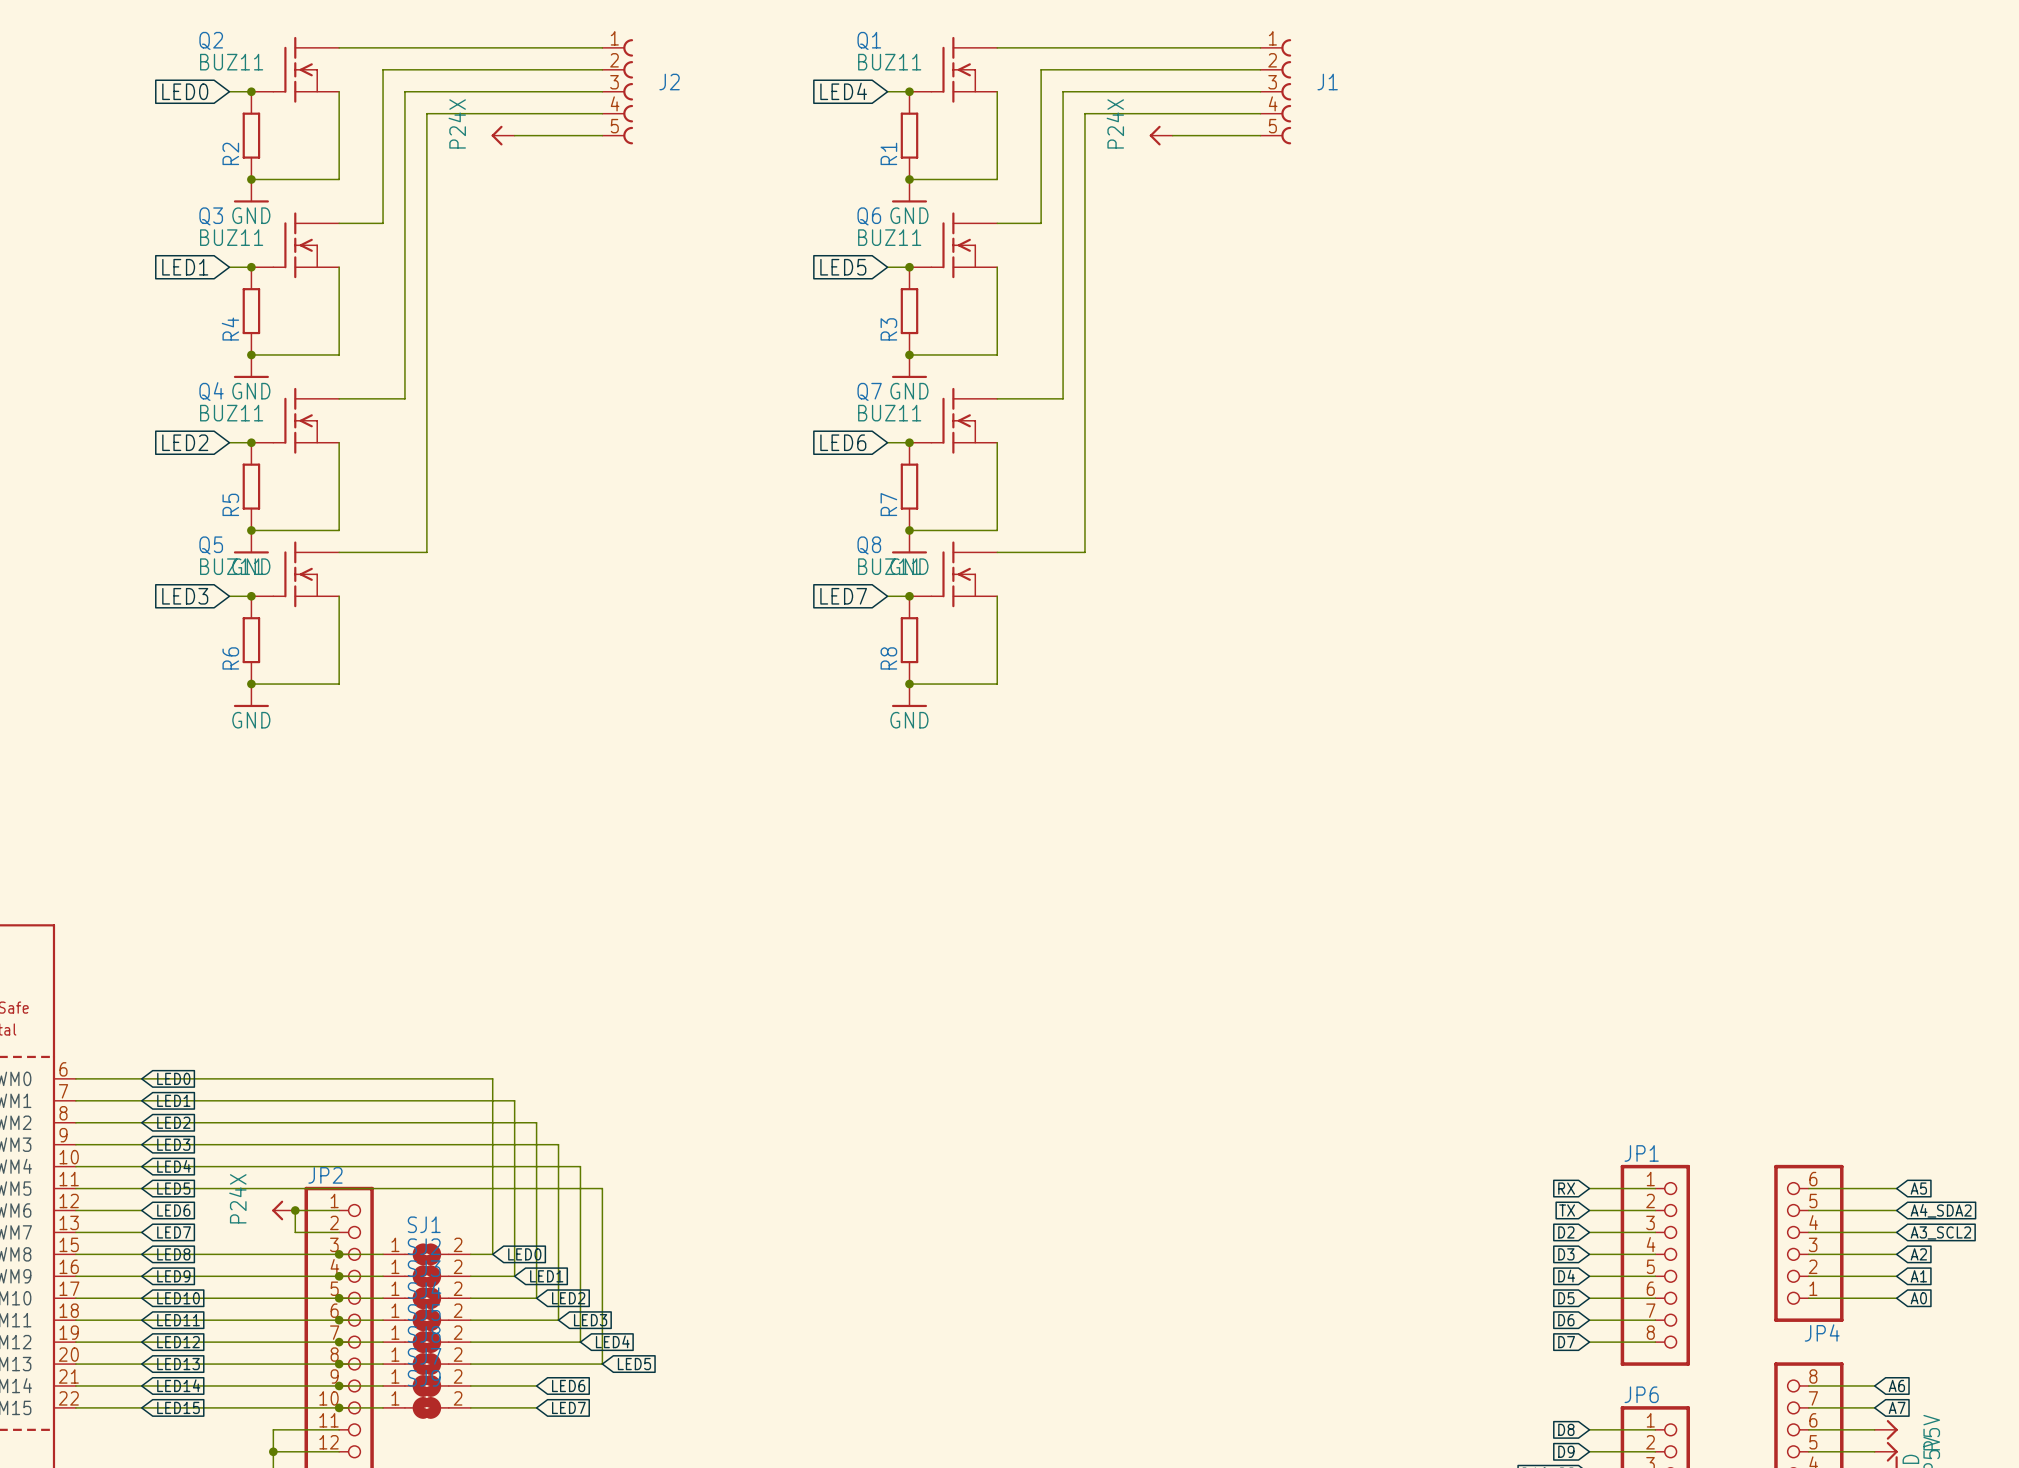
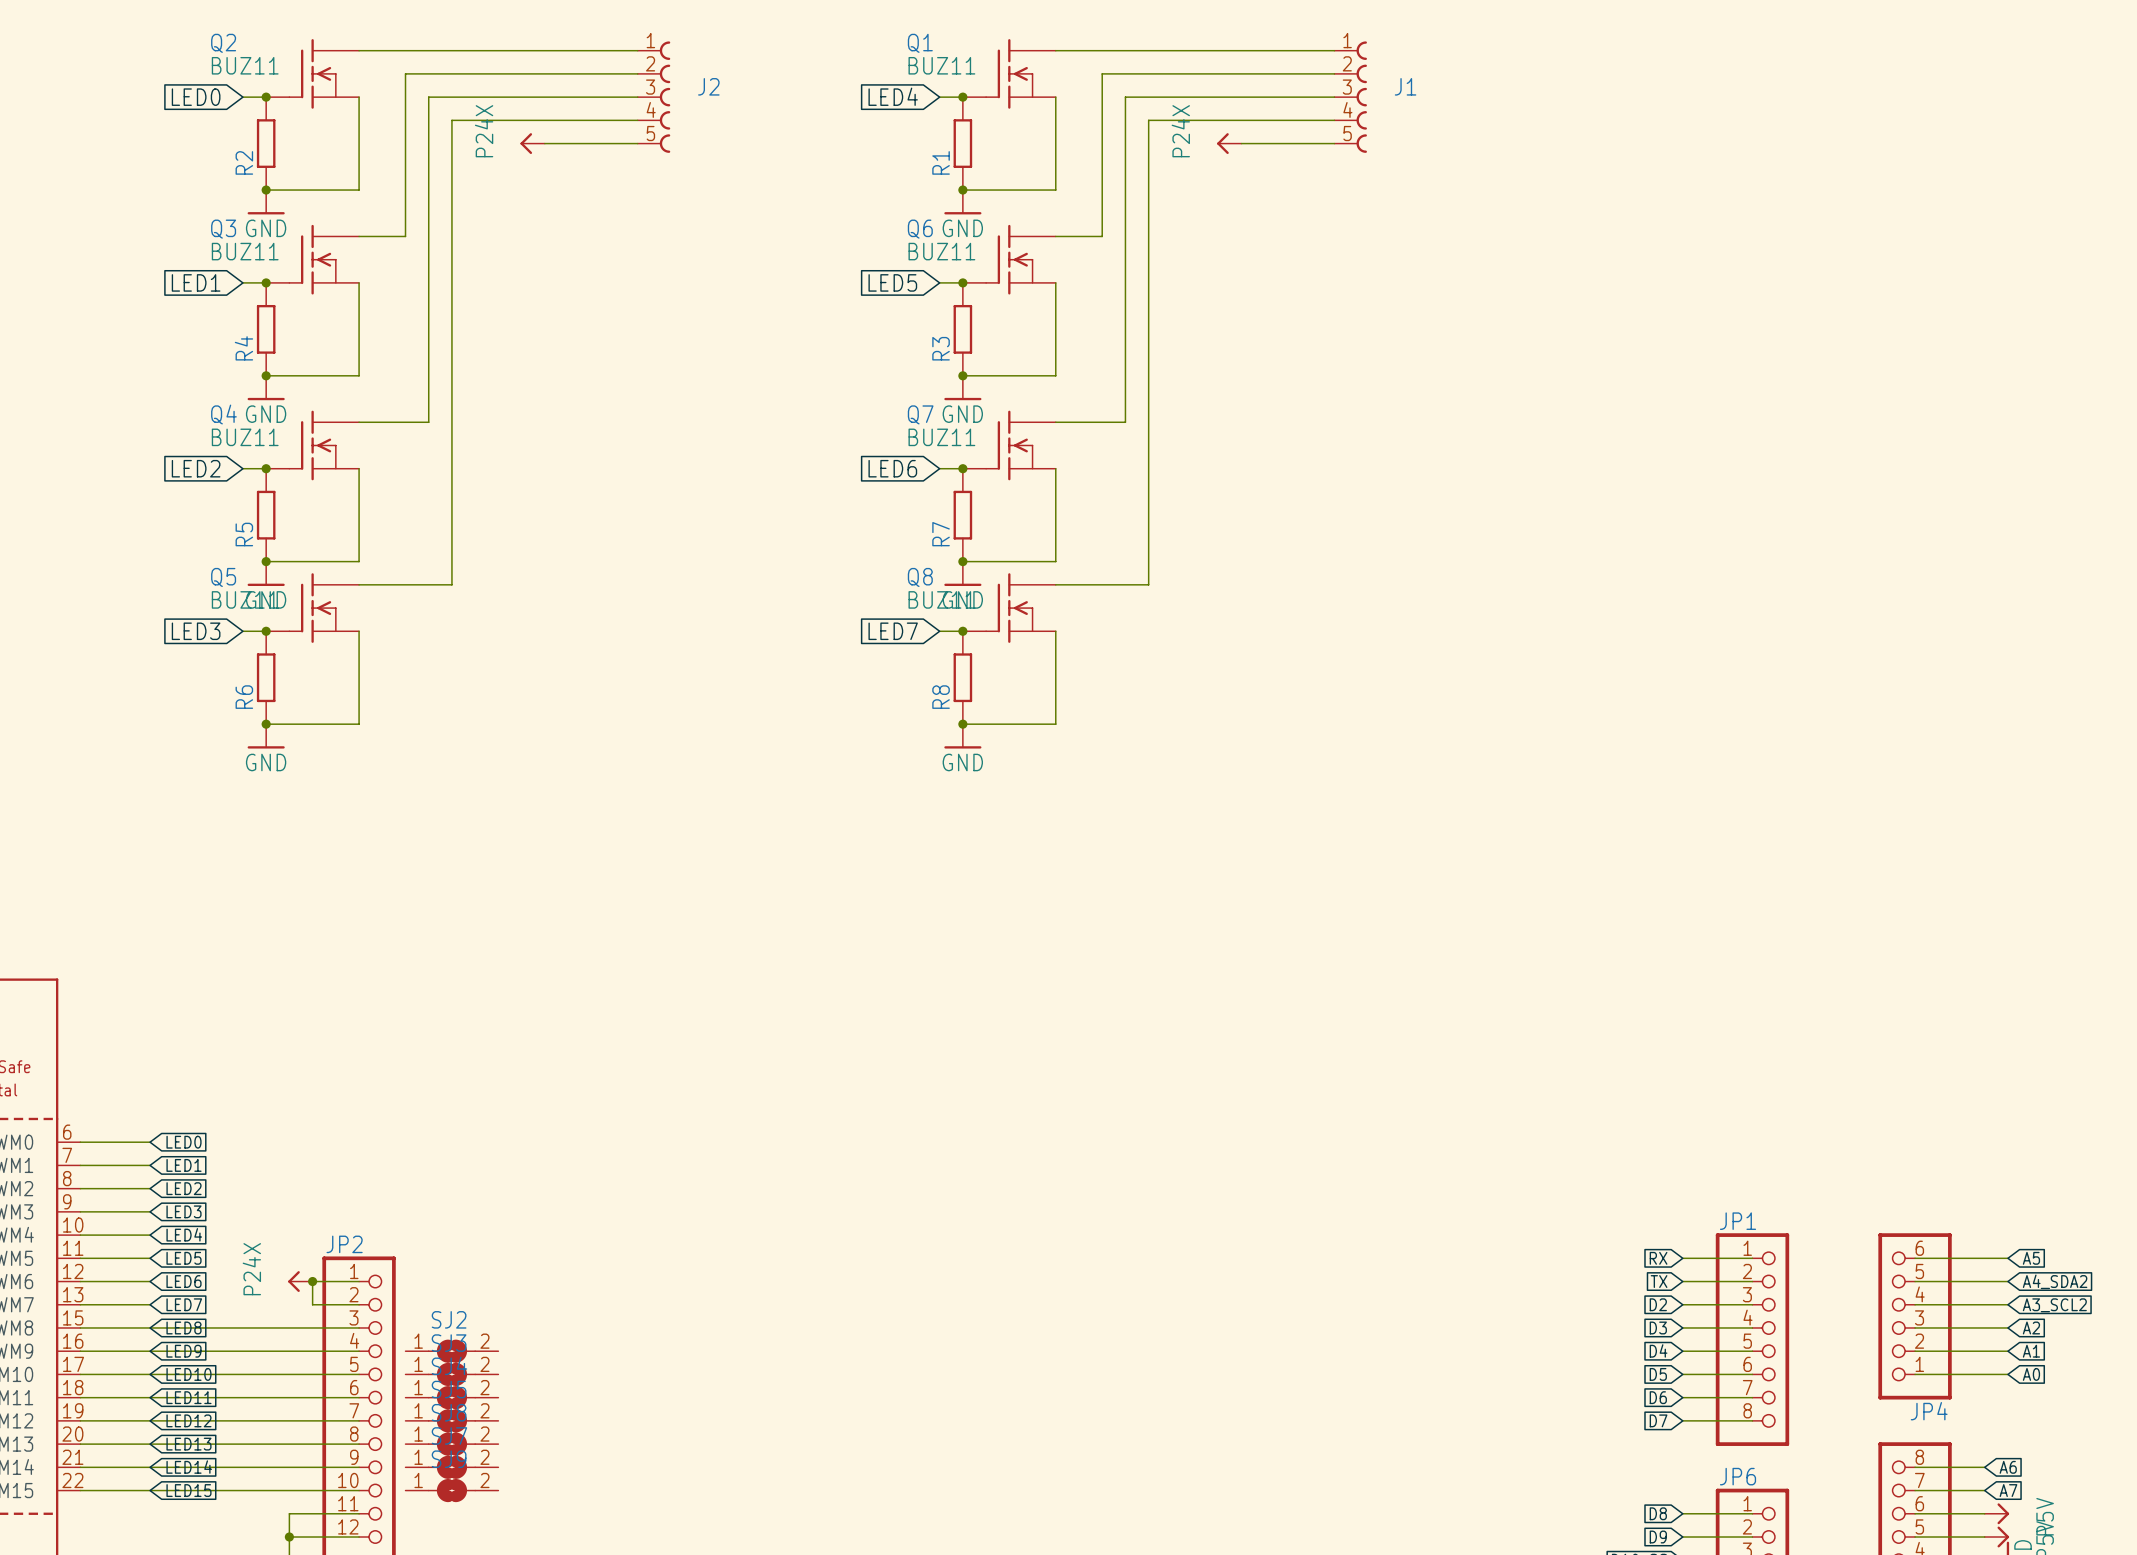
wire: (141, 1078) (492, 1078) (492, 1254) (470, 1254) -> none
wire: (141, 1100) (514, 1100) (514, 1276) (470, 1276) -> none
wire: (141, 1122) (536, 1122) (536, 1298) (470, 1298) -> none
wire: (141, 1144) (558, 1144) (558, 1320) (470, 1320) -> none
wire: (141, 1166) (580, 1166) (580, 1342) (470, 1342) -> none
wire: (141, 1188) (602, 1188) (602, 1364) (470, 1364) -> none
wire: (339, 1254) (383, 1254) -> none
junction: (339, 1254) -> none
SJ1: (426, 1254) -> none
global label: LED0 (524, 1254) -> none
wire: (339, 1276) (383, 1276) -> none
junction: (339, 1276) -> none
global label: LED1 (546, 1276) -> none
wire: (339, 1298) (383, 1298) -> none
junction: (339, 1298) -> none
global label: LED2 (568, 1298) -> none
wire: (339, 1320) (383, 1320) -> none
junction: (339, 1320) -> none
global label: LED3 (590, 1320) -> none
global label: LED4 (612, 1341) -> none
wire: (339, 1342) (383, 1342) -> none
junction: (339, 1342) -> none
wire: (339, 1364) (383, 1364) -> none
junction: (339, 1364) -> none
global label: LED5 (634, 1364) -> none
wire: (339, 1385) (383, 1385) -> none
junction: (339, 1385) -> none
wire: (470, 1385) (536, 1385) -> none
global label: LED6 (568, 1385) -> none
wire: (339, 1407) (383, 1407) -> none
junction: (339, 1407) -> none
wire: (470, 1407) (536, 1407) -> none
global label: LED7 (568, 1407) -> none

